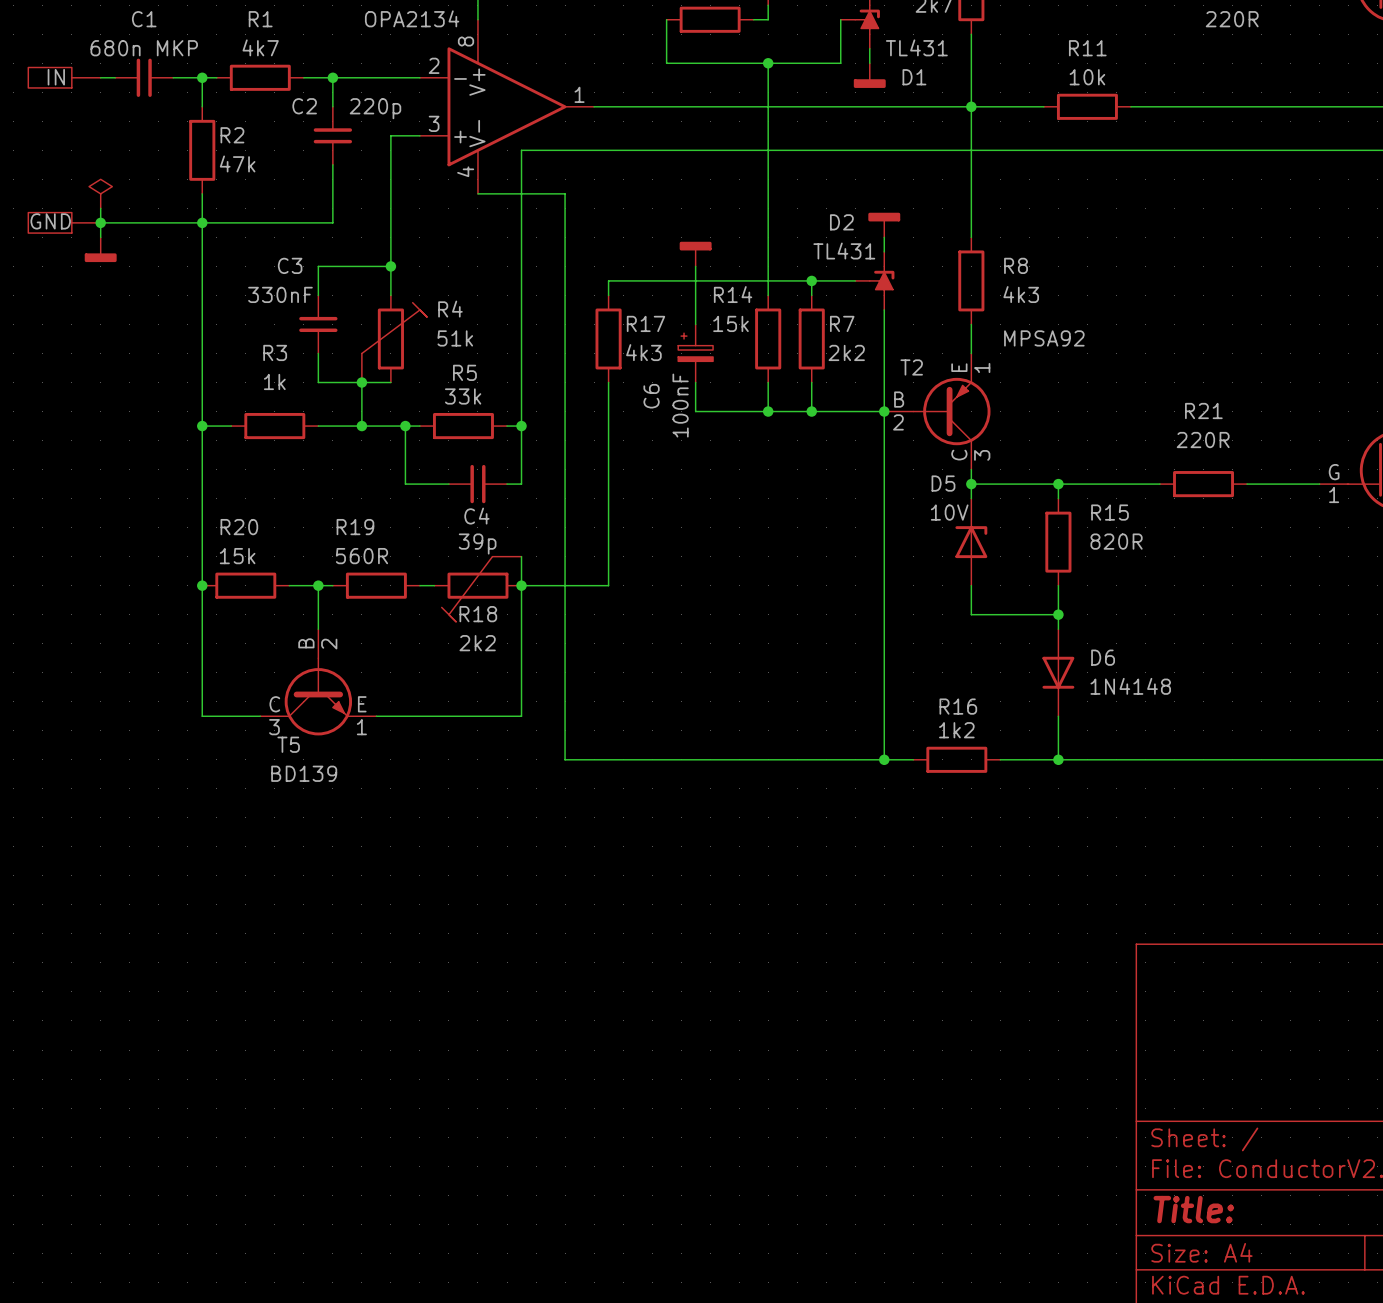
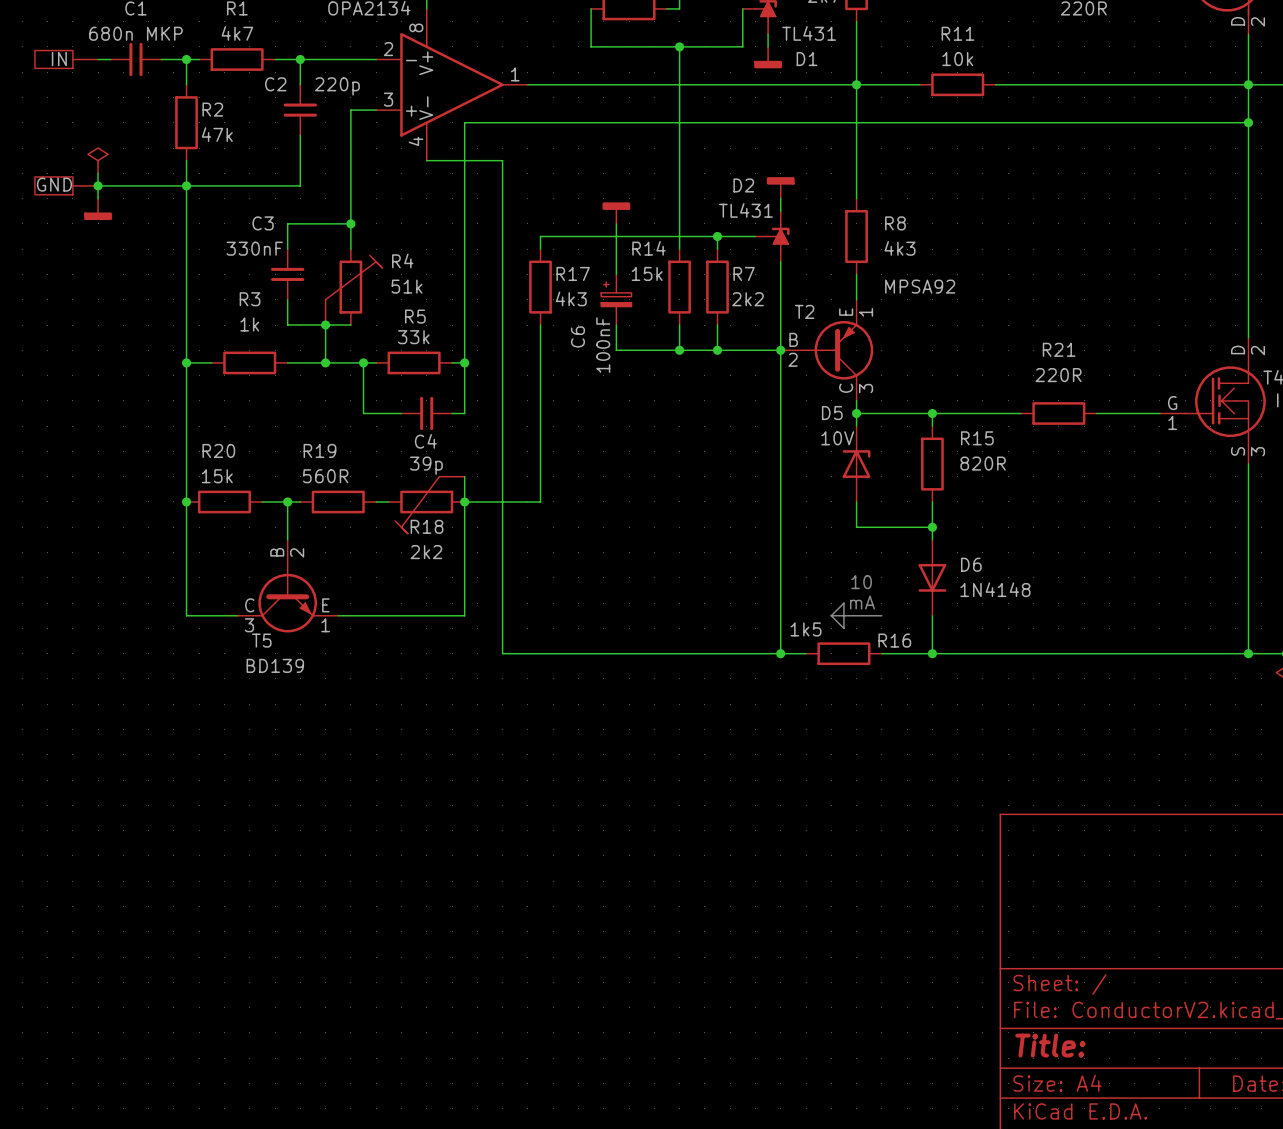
text: none -> 10 (861, 582)
text: none -> mA (862, 602)
R16 name position: R16 (958, 706) -> R16 (894, 640)
line: none -> (831, 615) (843, 603) (843, 628) (831, 615)
line: none -> (831, 615) (881, 615)
R16 value: 1k2 (956, 730) -> 1k5 (806, 629)

